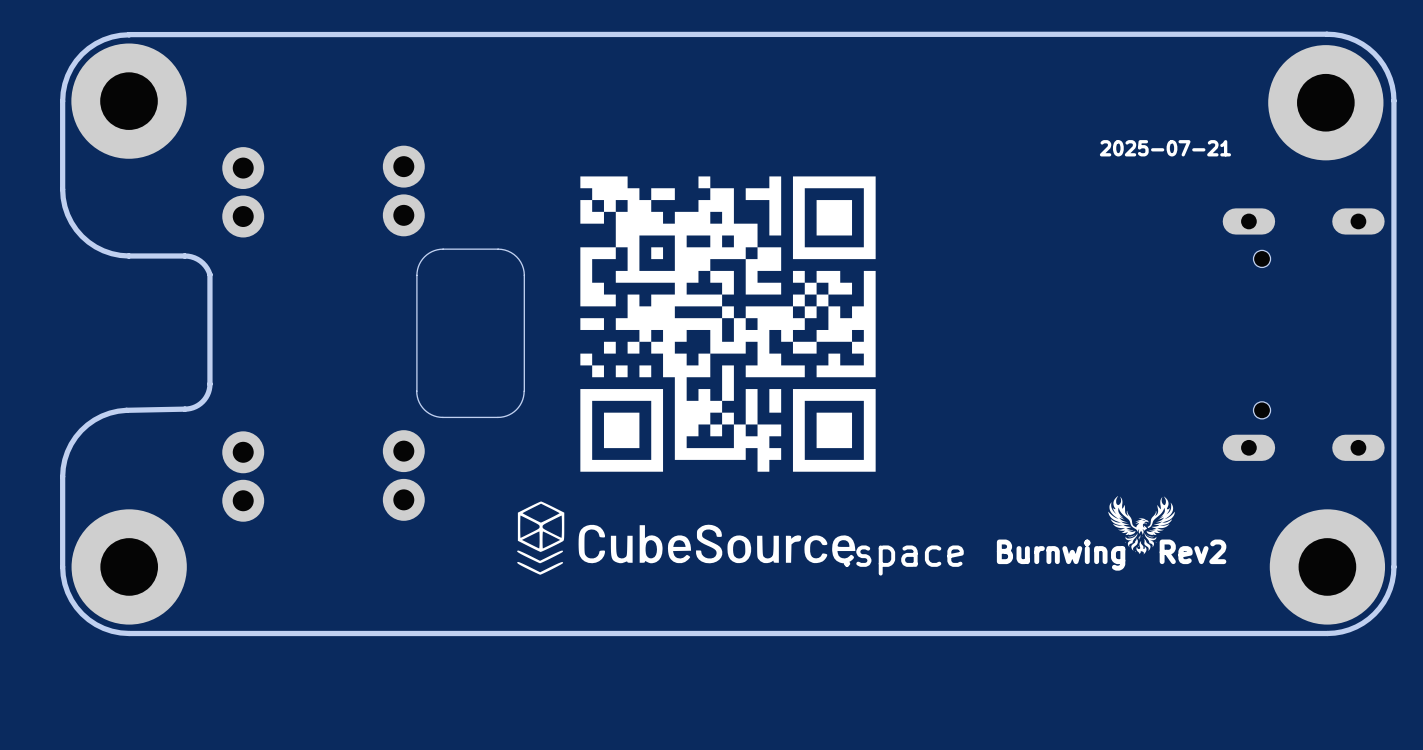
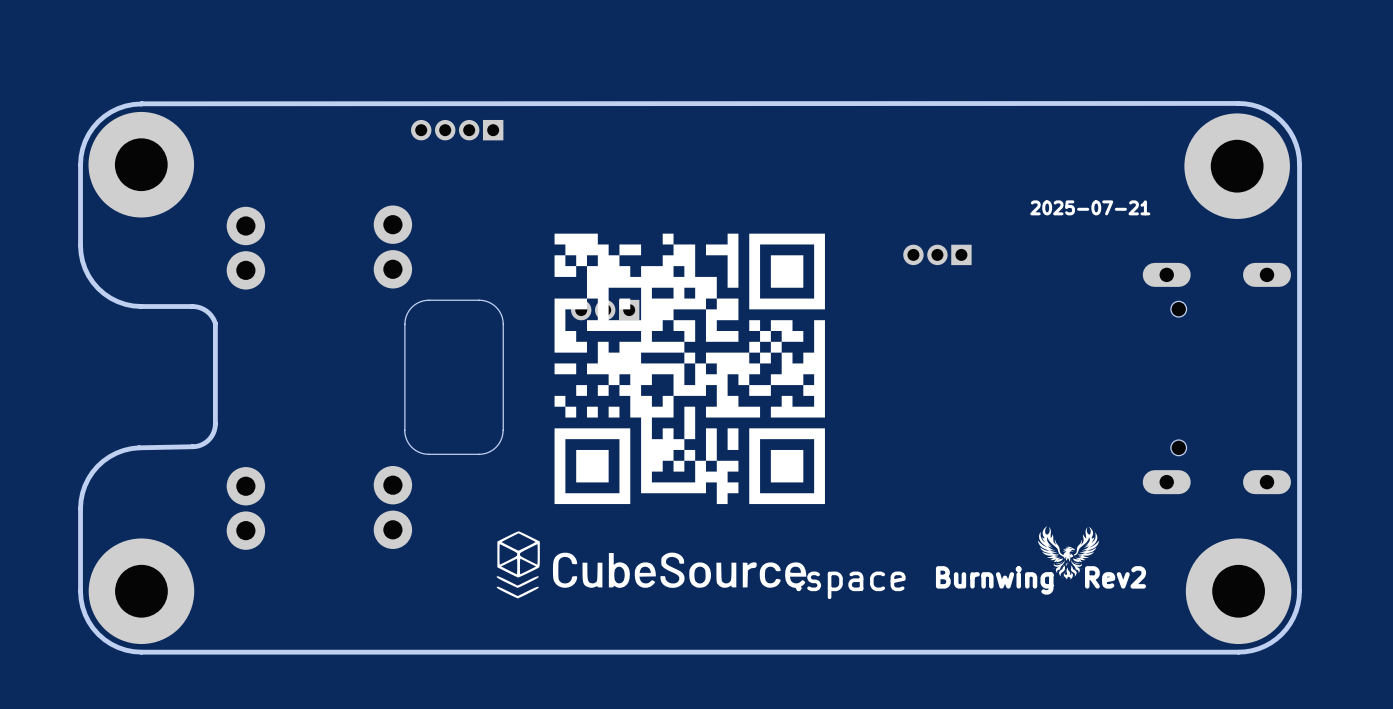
part: none -> (457, 130)
part: none -> (937, 254)
part: none -> (605, 310)

